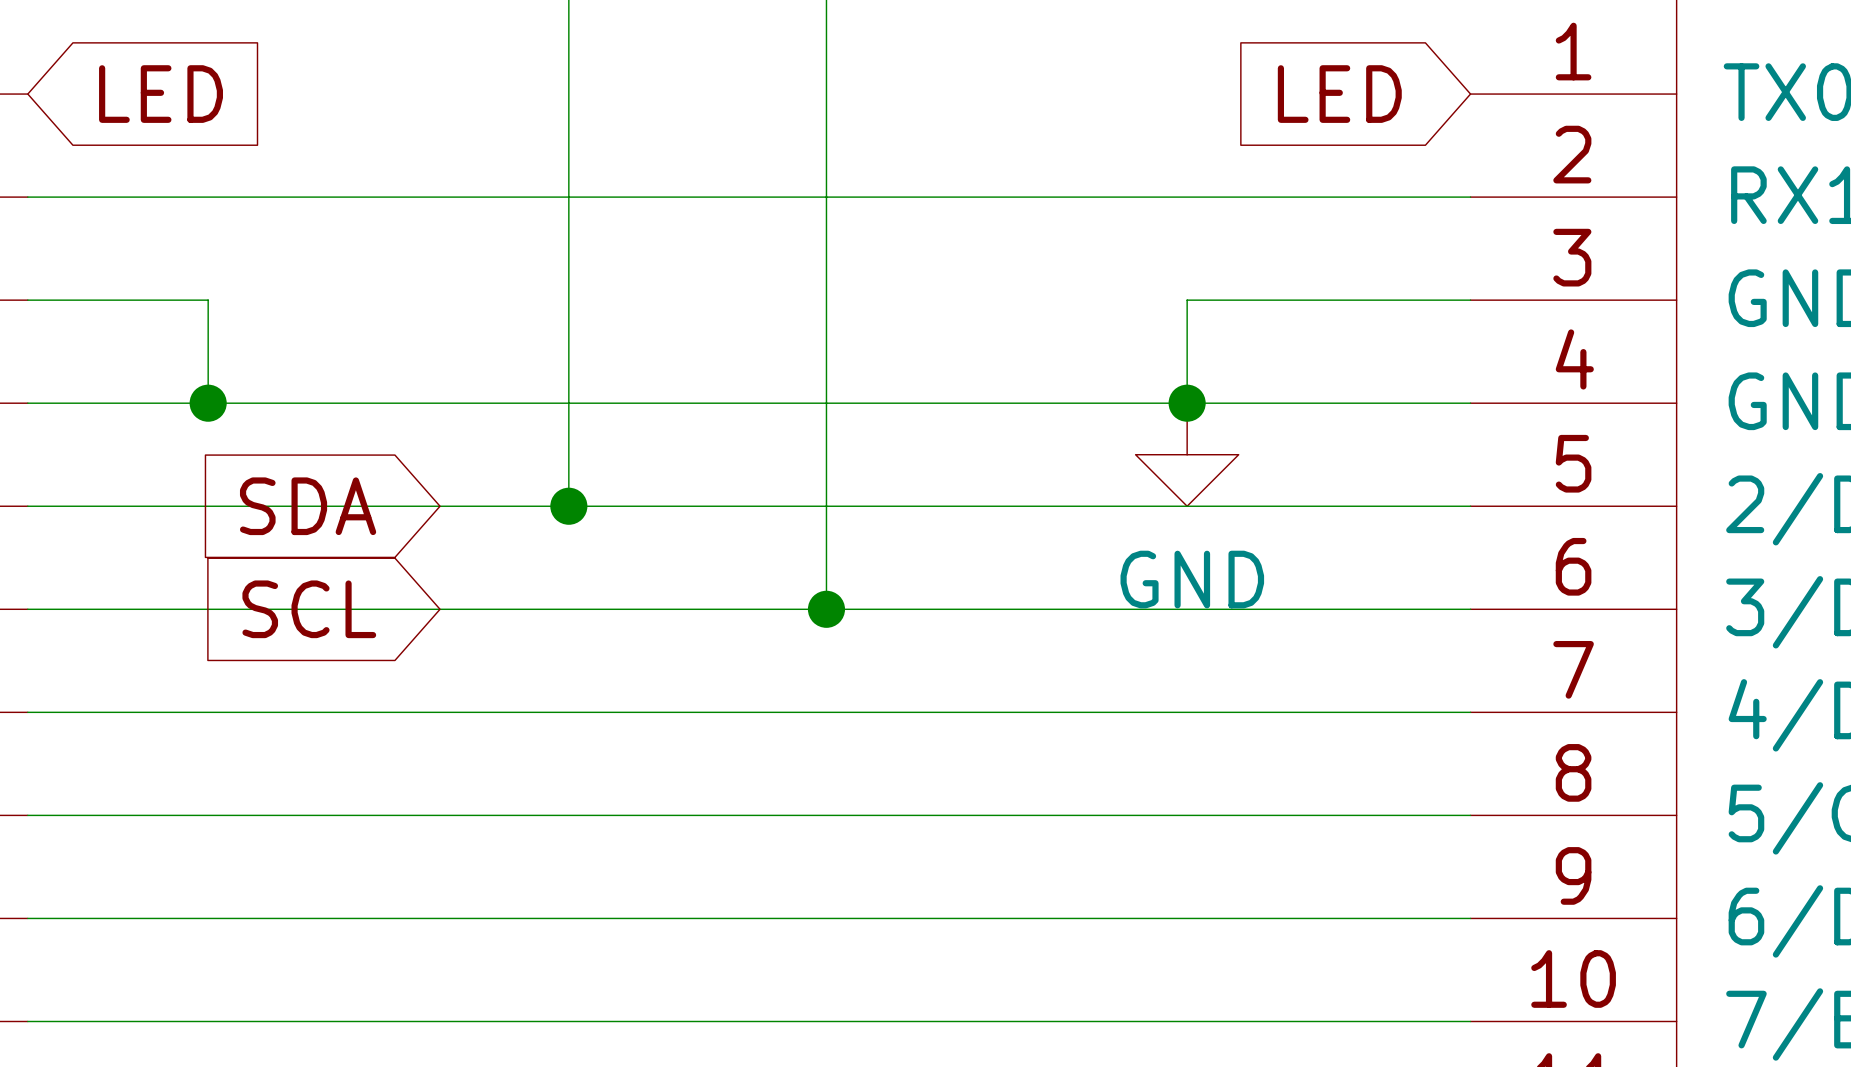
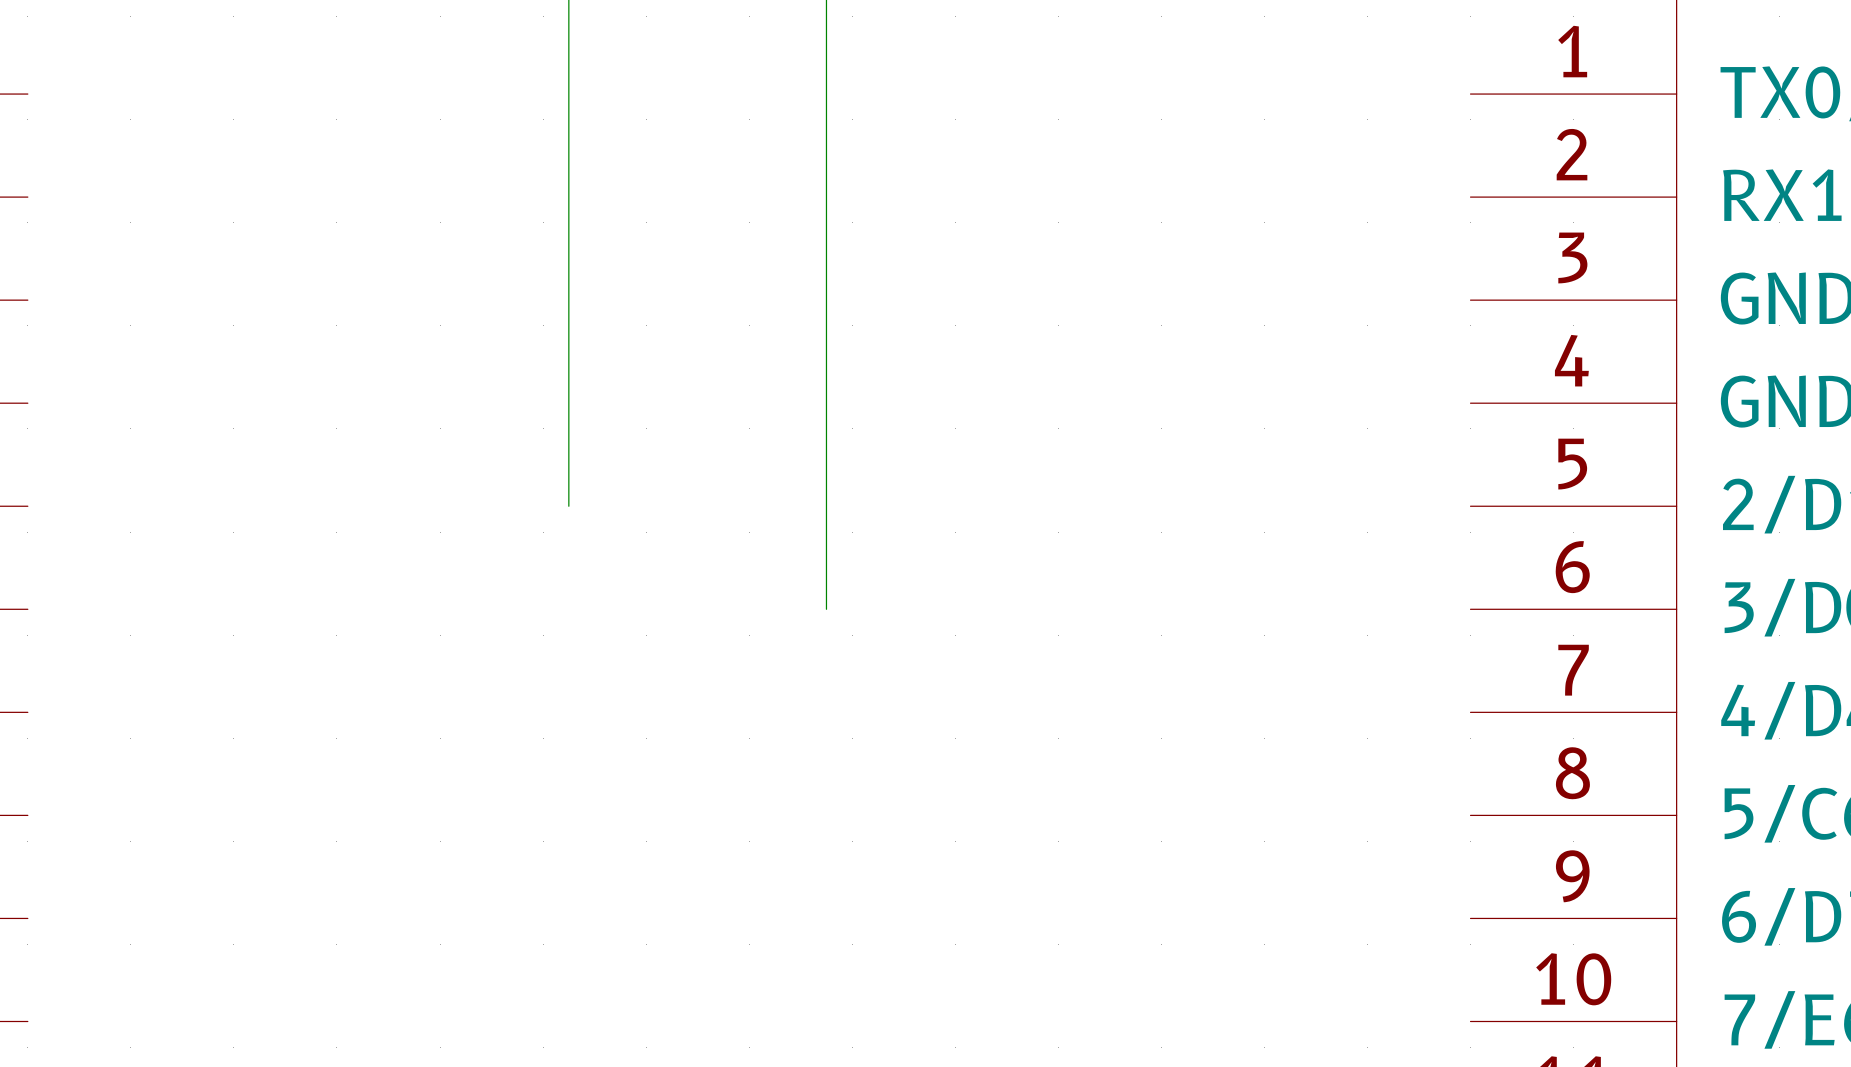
global label: LED (161, 94) -> none
global label: LED (1339, 94) -> none
wire: (27, 197) (1470, 197) -> none
wire: (27, 300) (208, 300) (208, 403) -> none
wire: (1470, 300) (1187, 300) (1187, 403) -> none
wire: (27, 403) (1470, 403) -> none
junction: (208, 403) -> none
junction: (1187, 403) -> none
power symbol: GND (1187, 454) -> none
wire: (27, 506) (1470, 506) -> none
global label: SDA (308, 506) -> none
junction: (568, 506) -> none
wire: (27, 609) (1470, 609) -> none
global label: SCL (309, 609) -> none
junction: (826, 609) -> none
wire: (27, 712) (1470, 712) -> none
wire: (27, 815) (1470, 815) -> none
wire: (27, 918) (1470, 918) -> none
wire: (27, 1021) (1470, 1021) -> none

